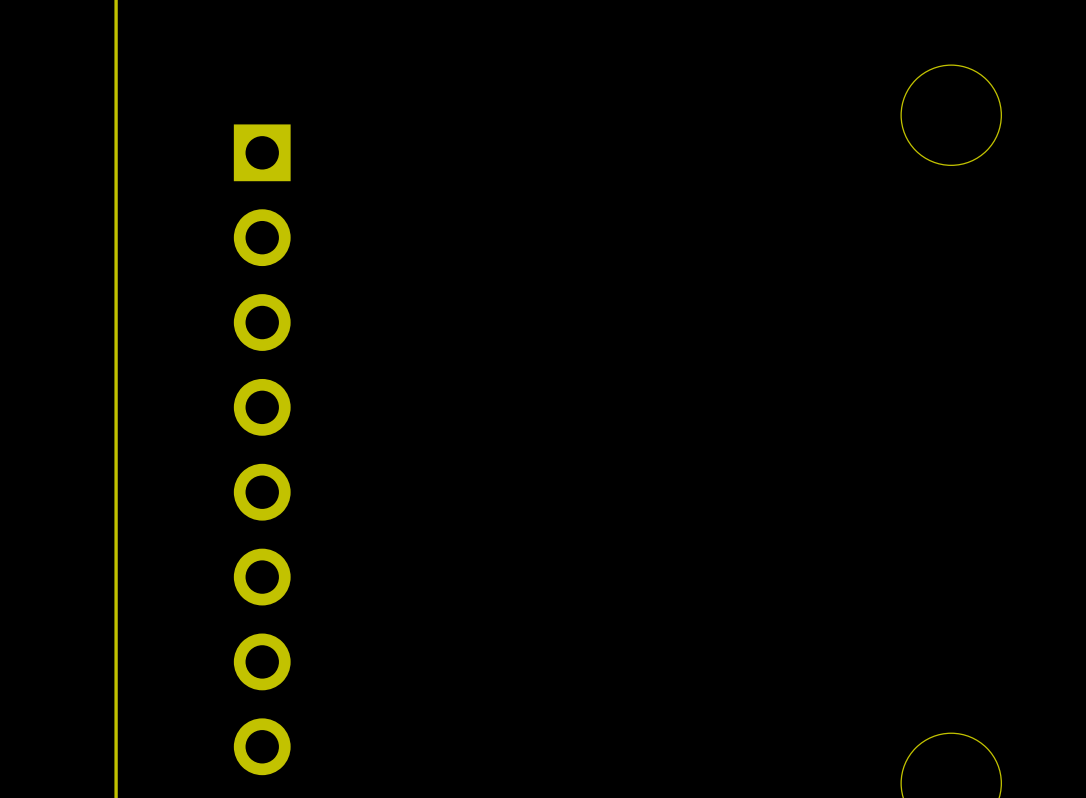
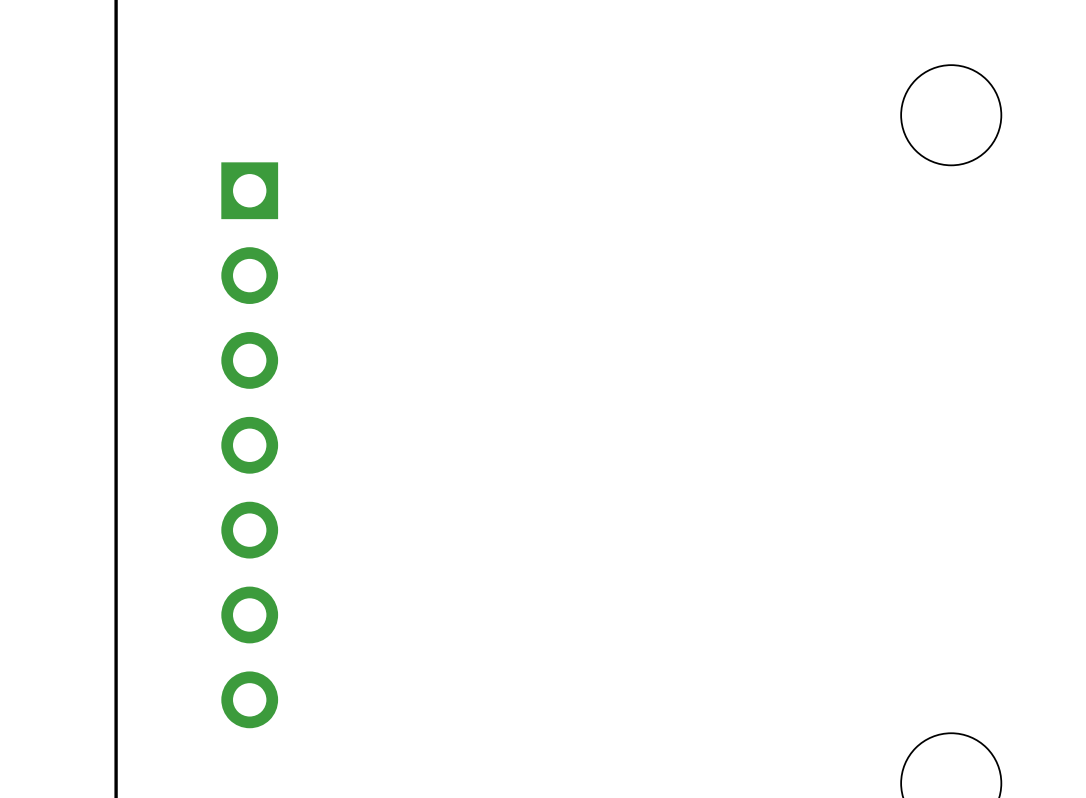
part footprint: [233, 124, 291, 776] -> [221, 162, 279, 729]

